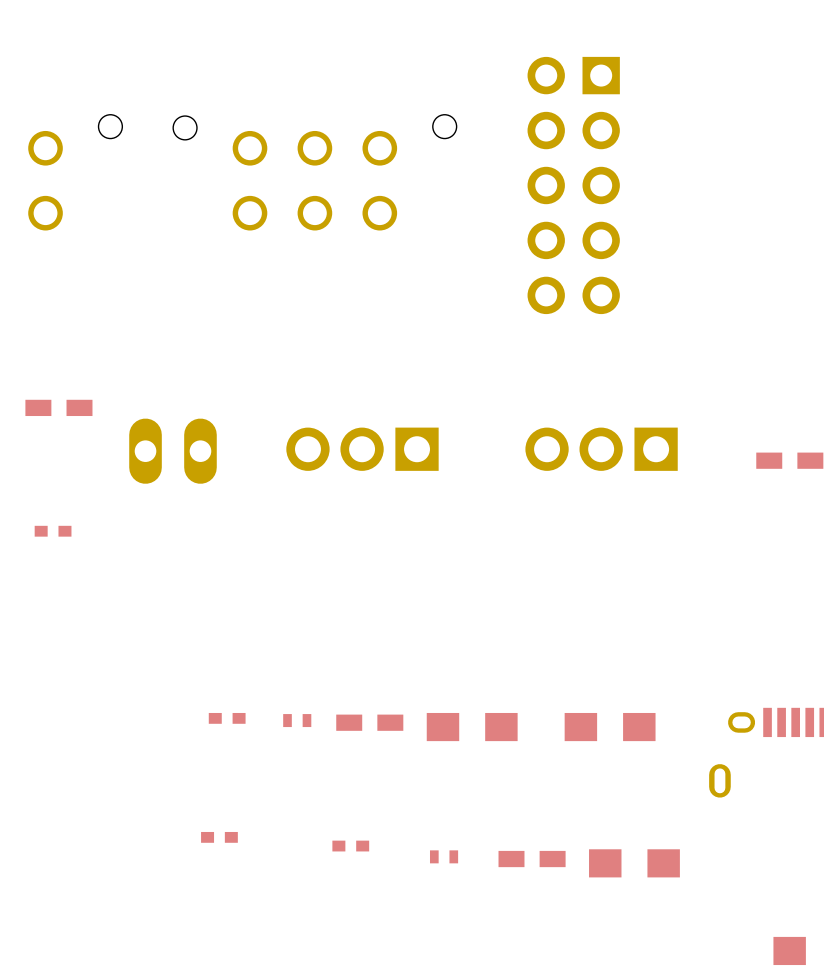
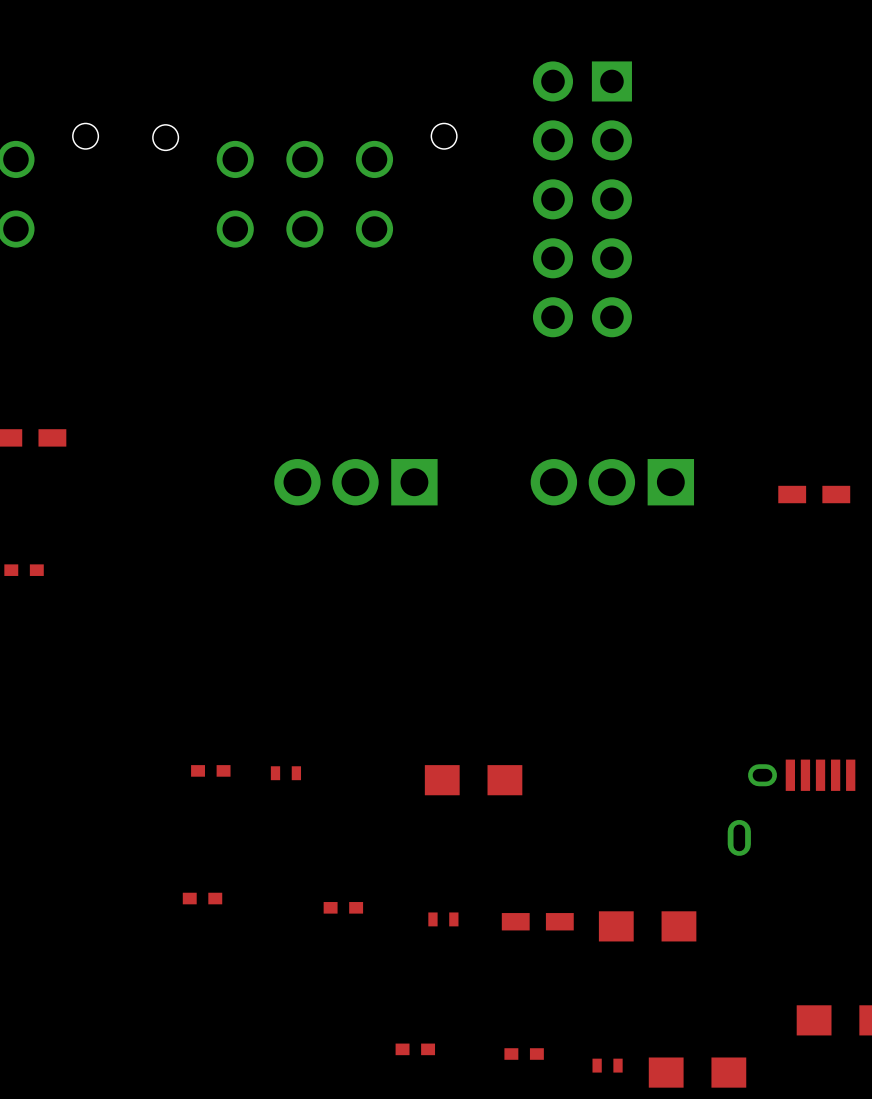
part: (172, 451) -> none
part: (369, 722) -> none
part: (610, 727) -> none

